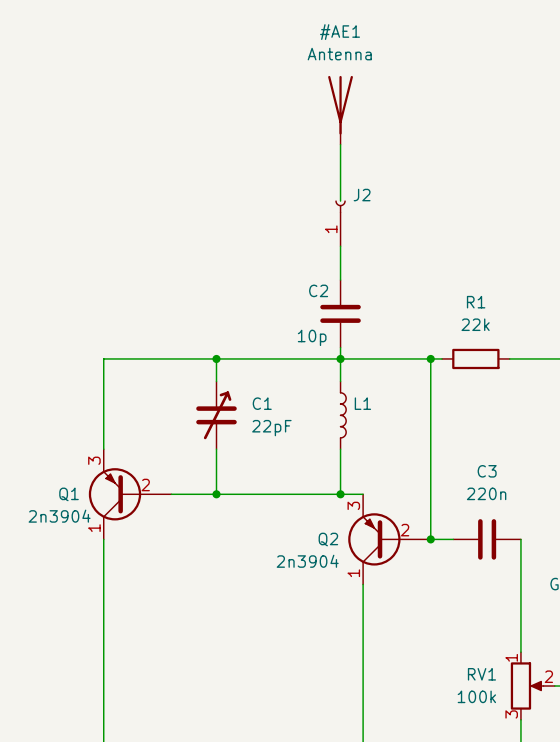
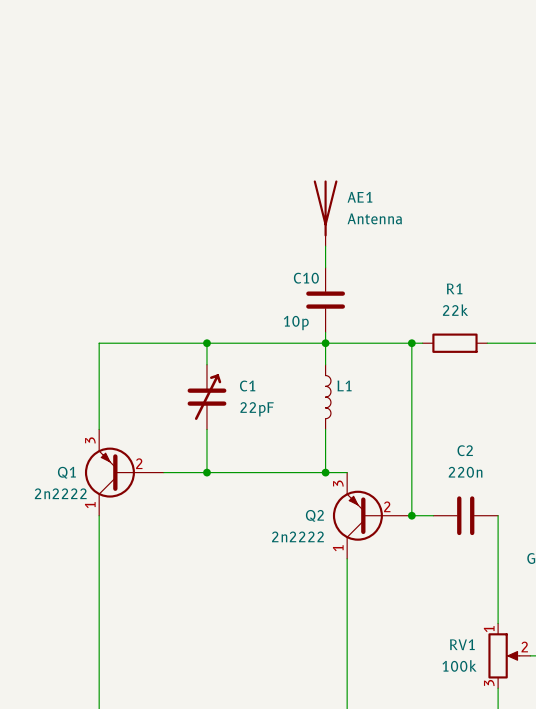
#AE1: Antenna (340, 110) -> none
wire: (340, 144) (340, 201) -> none
J2: (340, 223) -> none
AE1: none -> Antenna (325, 213)
C2 name: C2 (318, 290) -> C10 (306, 278)
C3 name: C3 (487, 471) -> C2 (465, 450)
Q1 value: 2n3904 (59, 516) -> 2n2222 (60, 493)
Q2 value: 2n3904 (307, 561) -> 2n2222 (297, 536)

